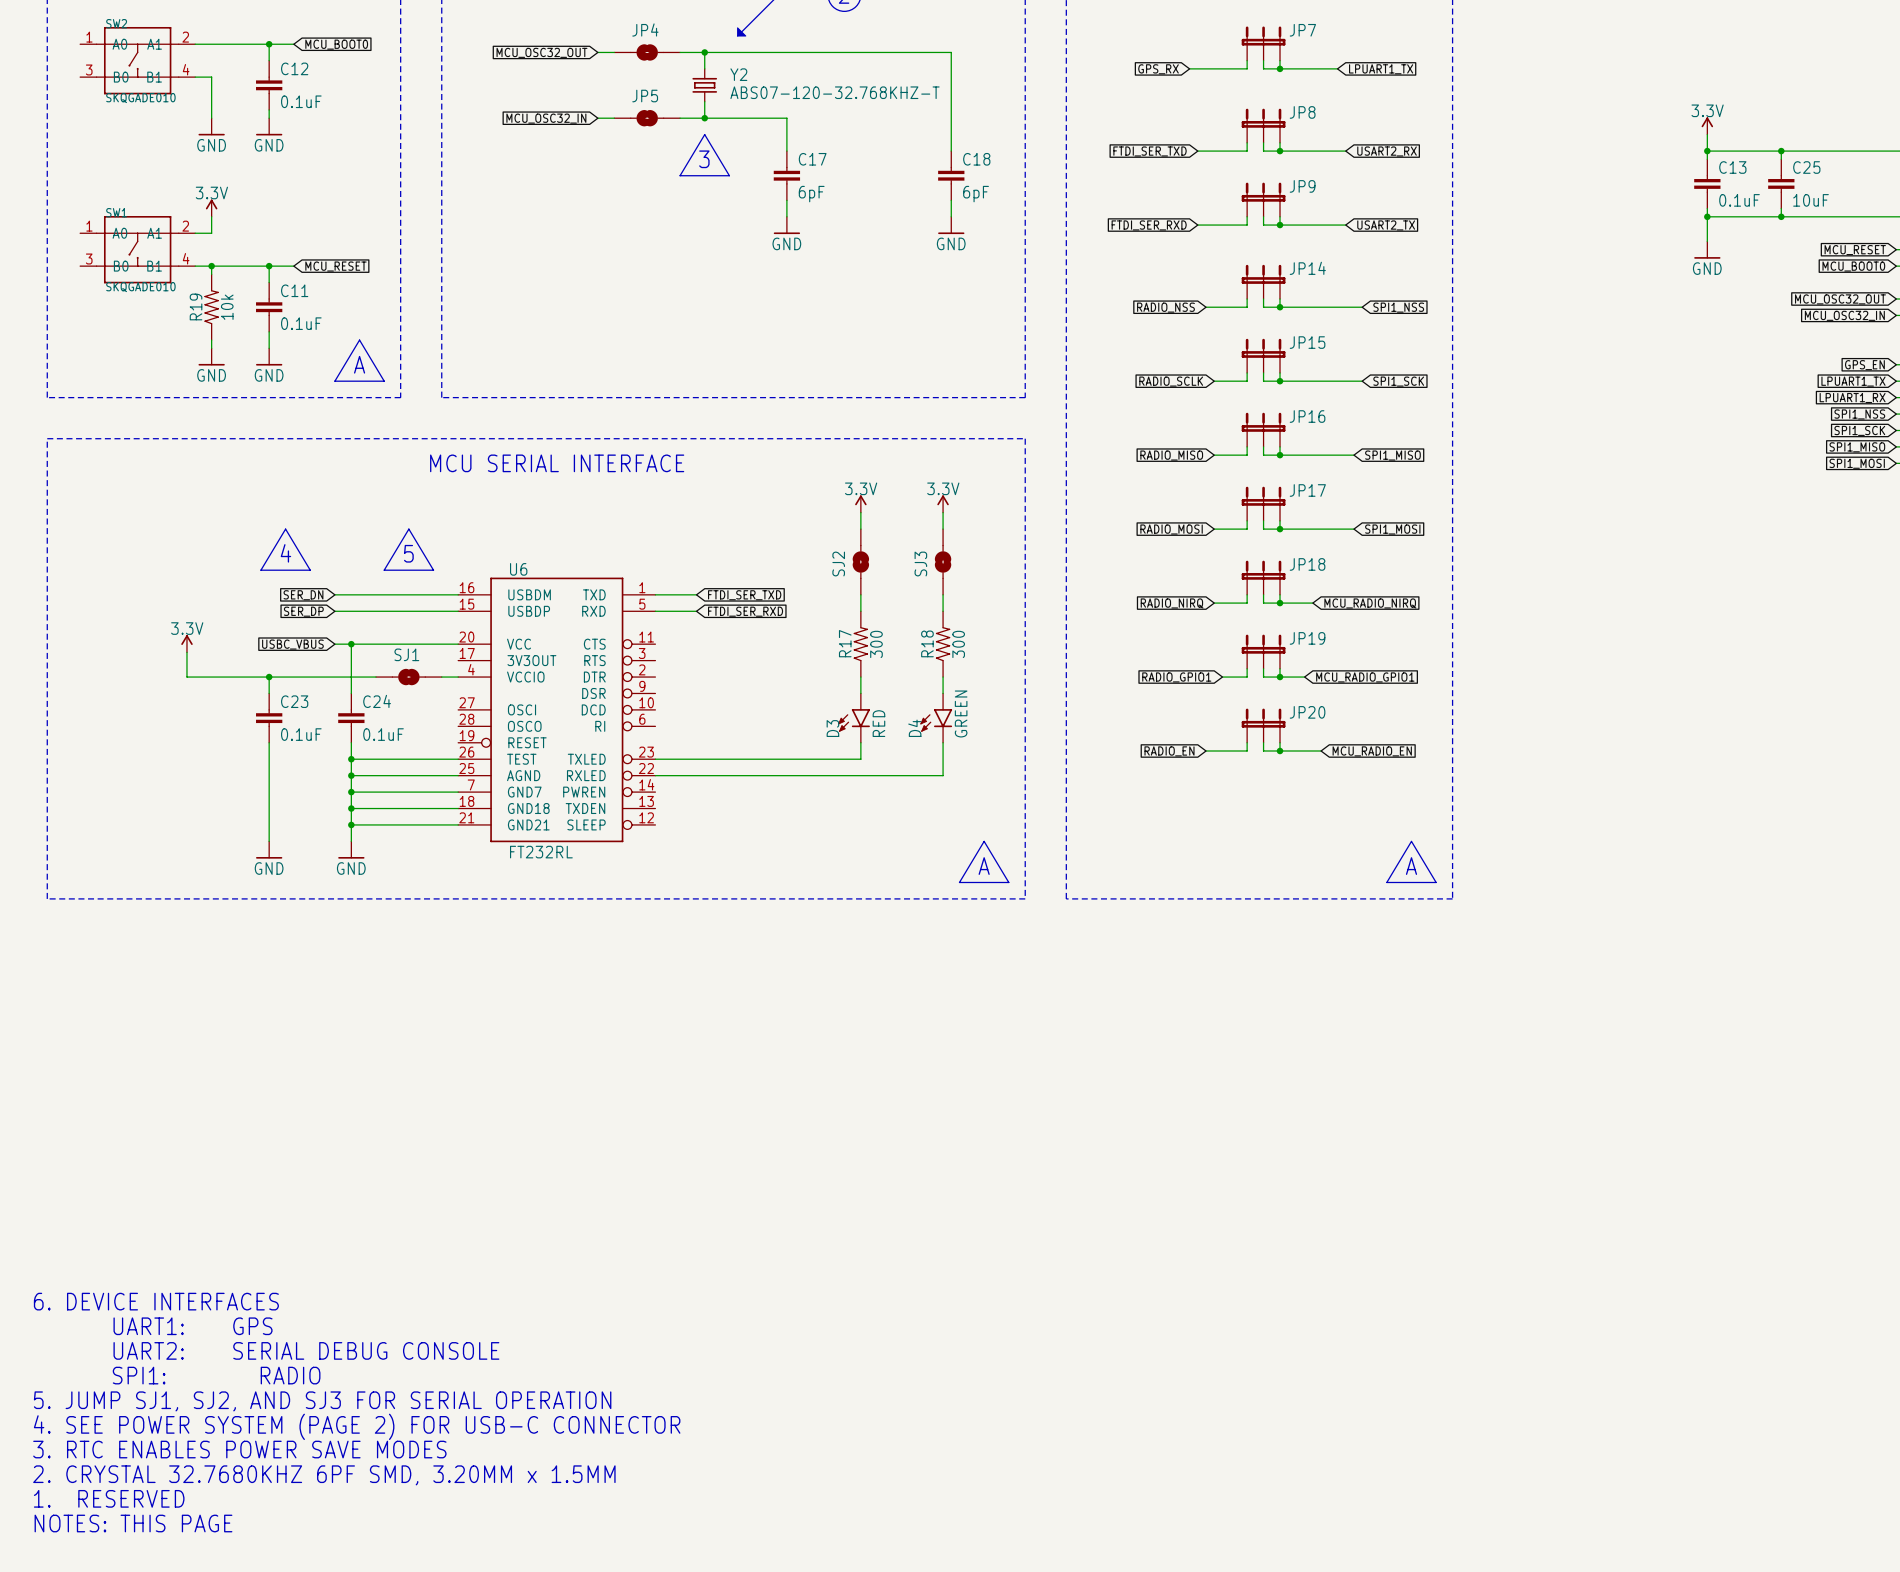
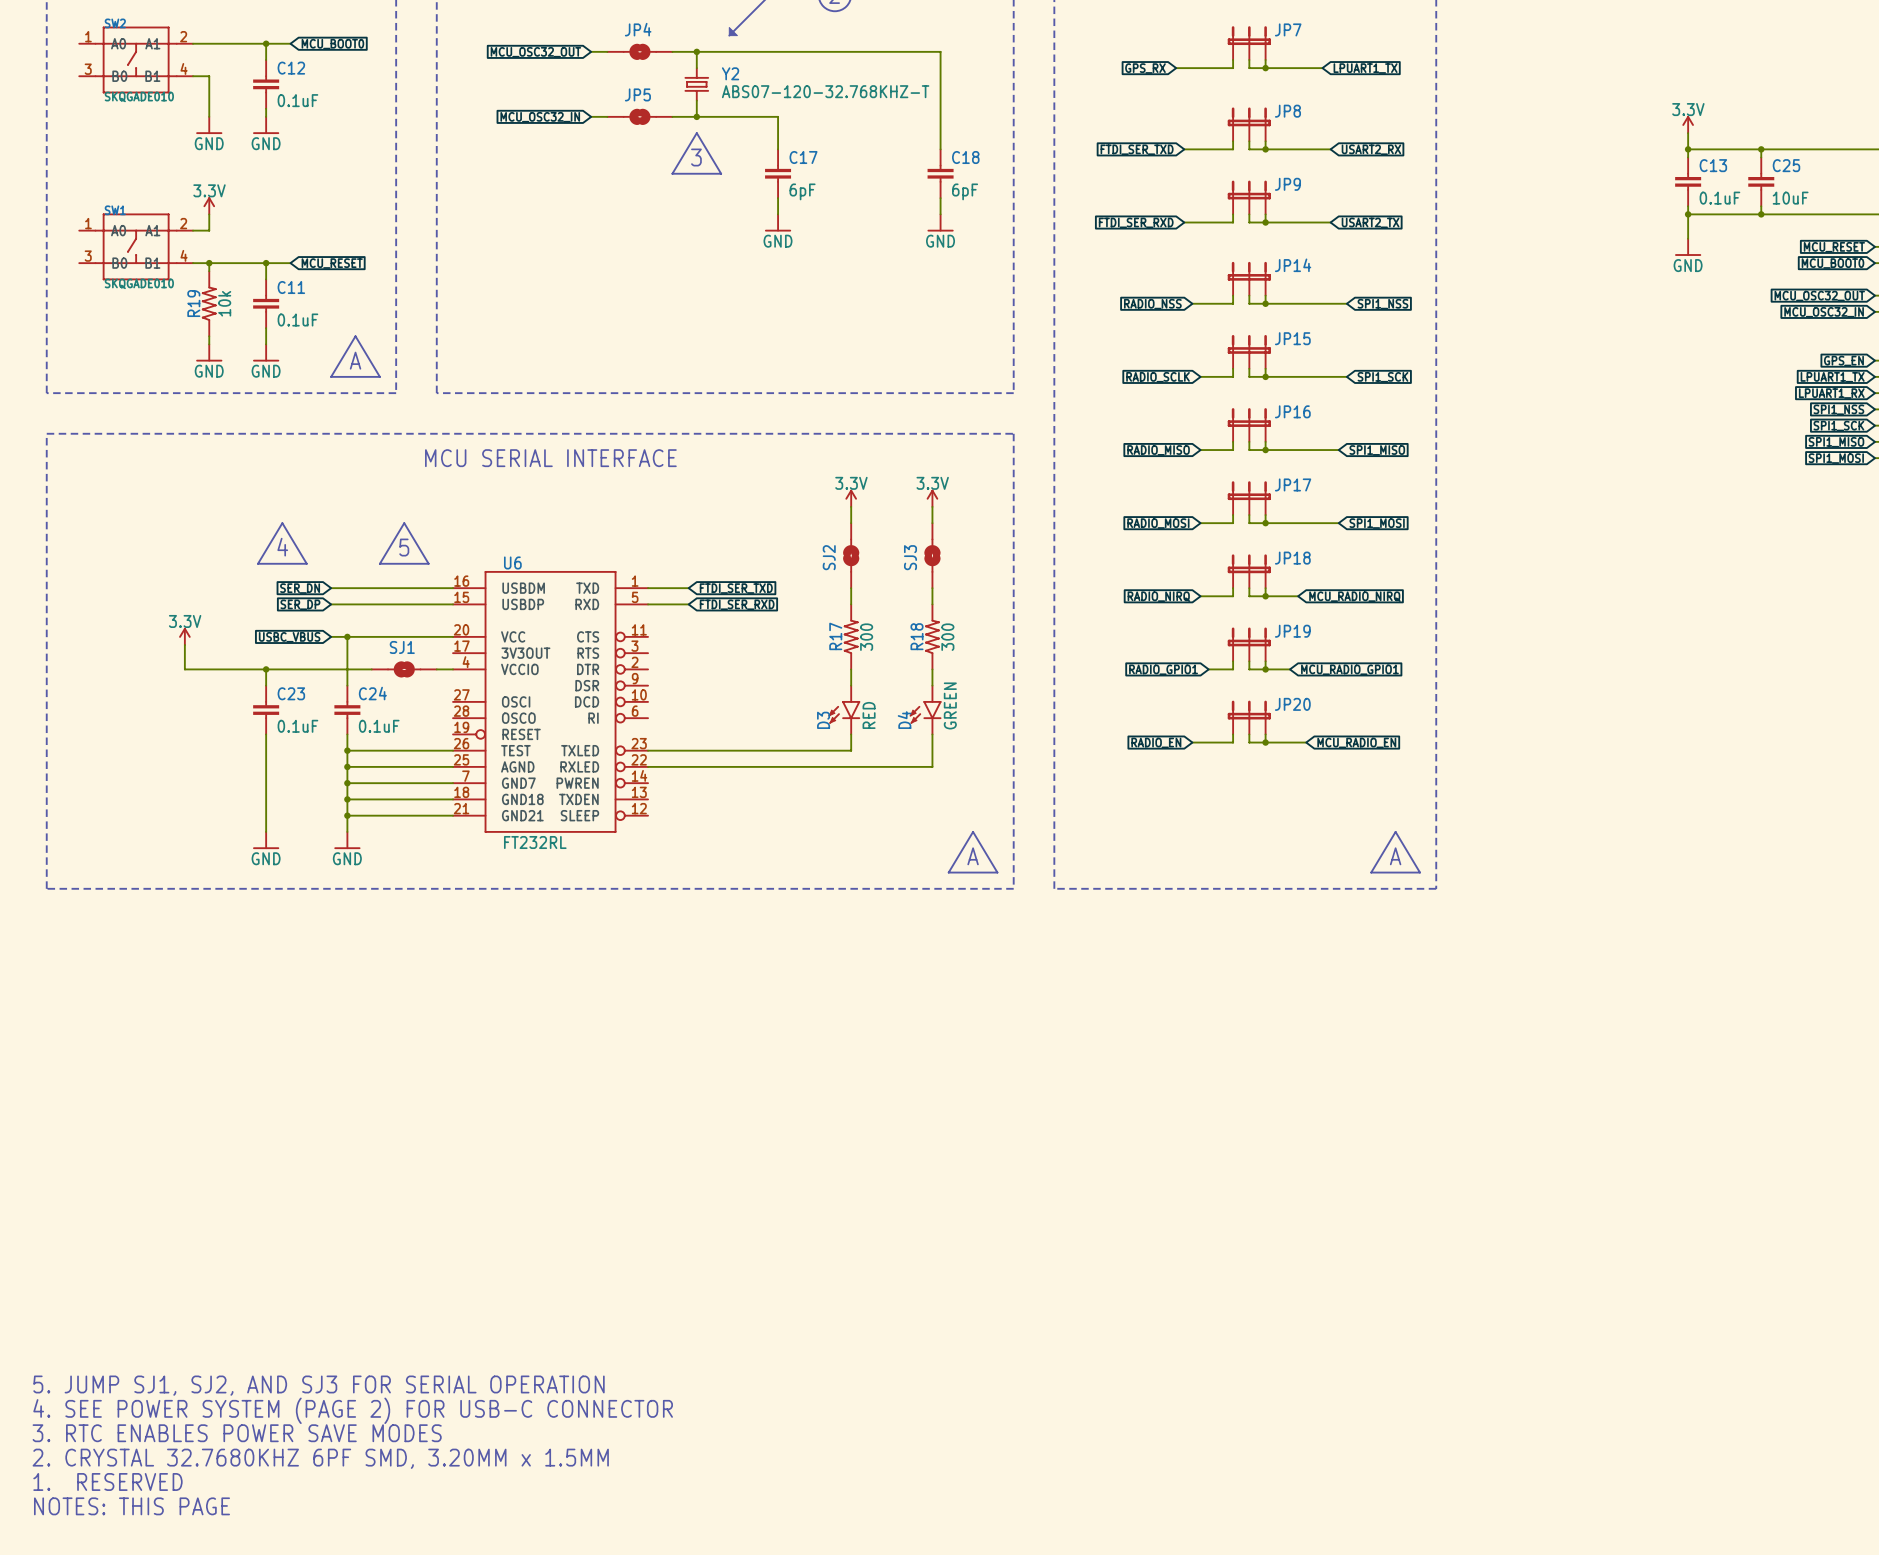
text: 6. DEVICE INTERFACES (156, 1301) -> none
text: UART1: GPS (193, 1326) -> none
text: UART2: SERIAL DEBUG CONSOLE (306, 1350) -> none
text: SPI1: RADIO (216, 1375) -> none

